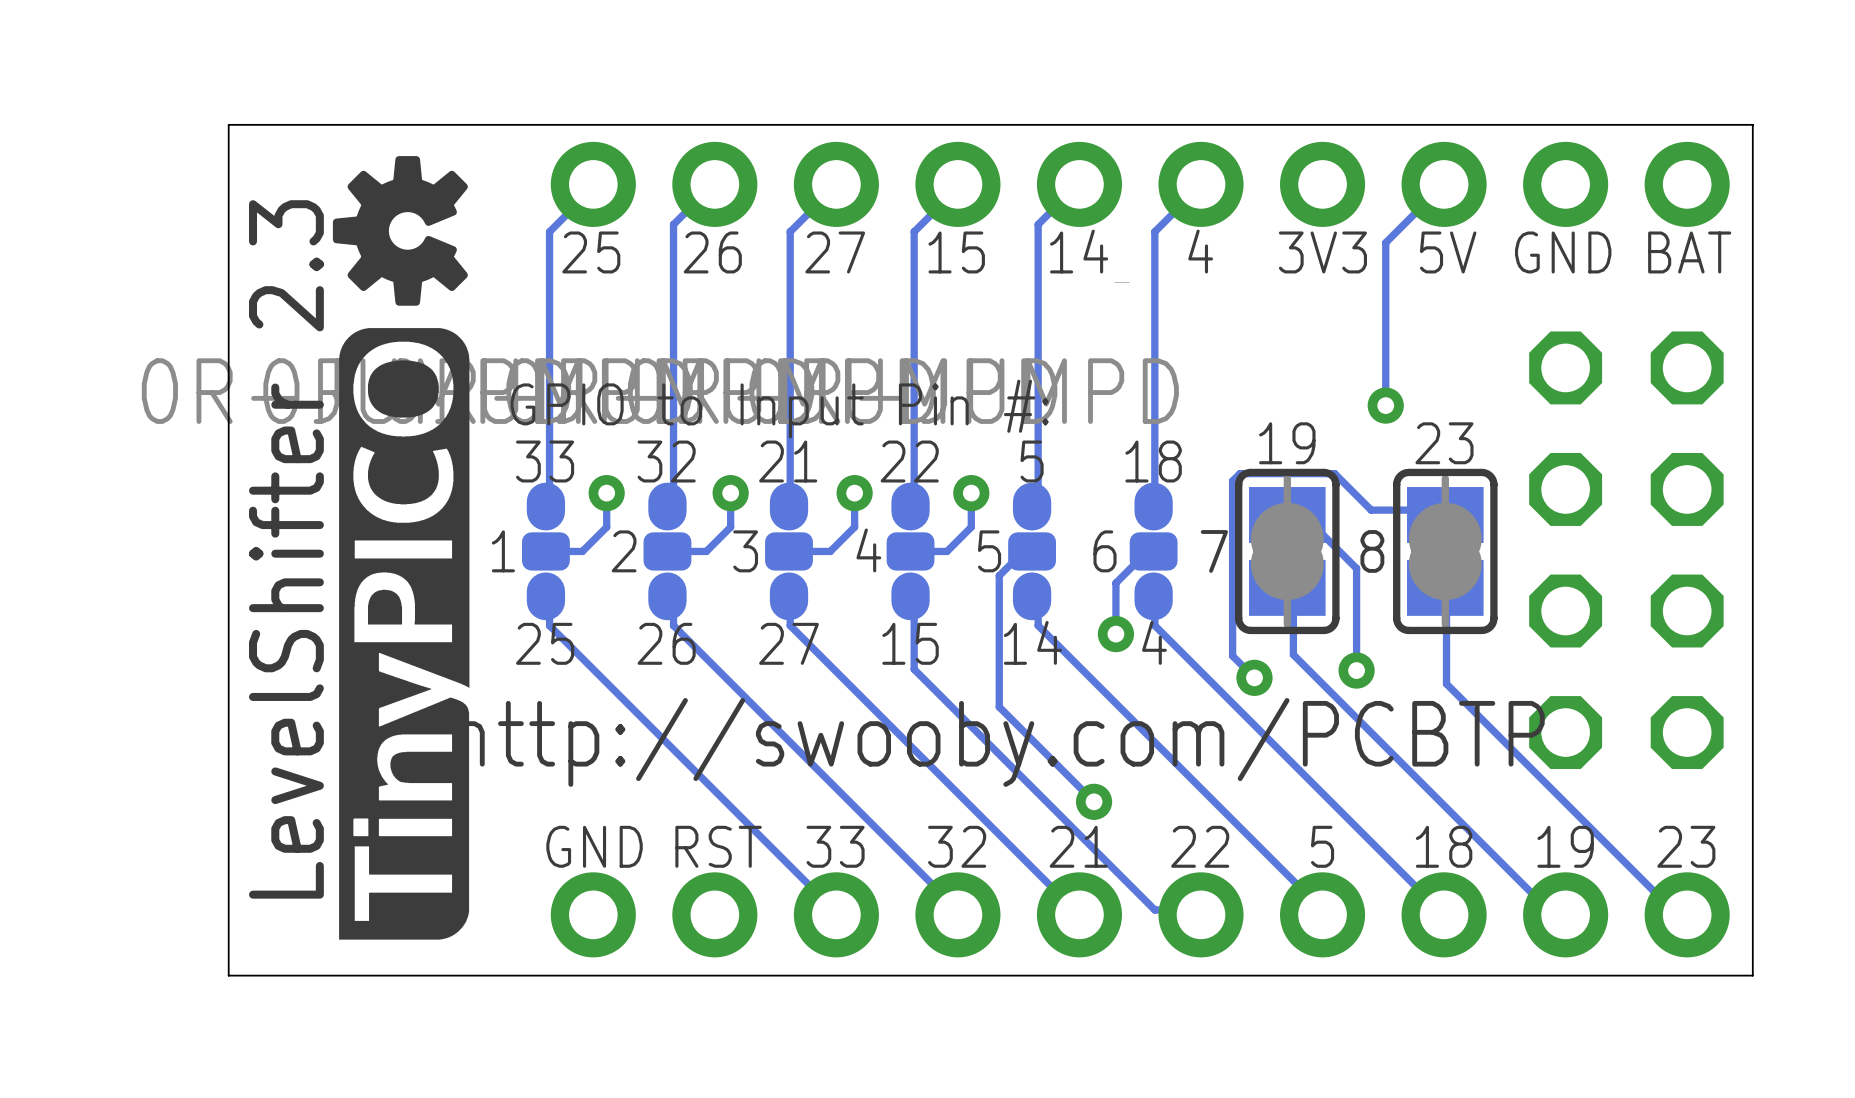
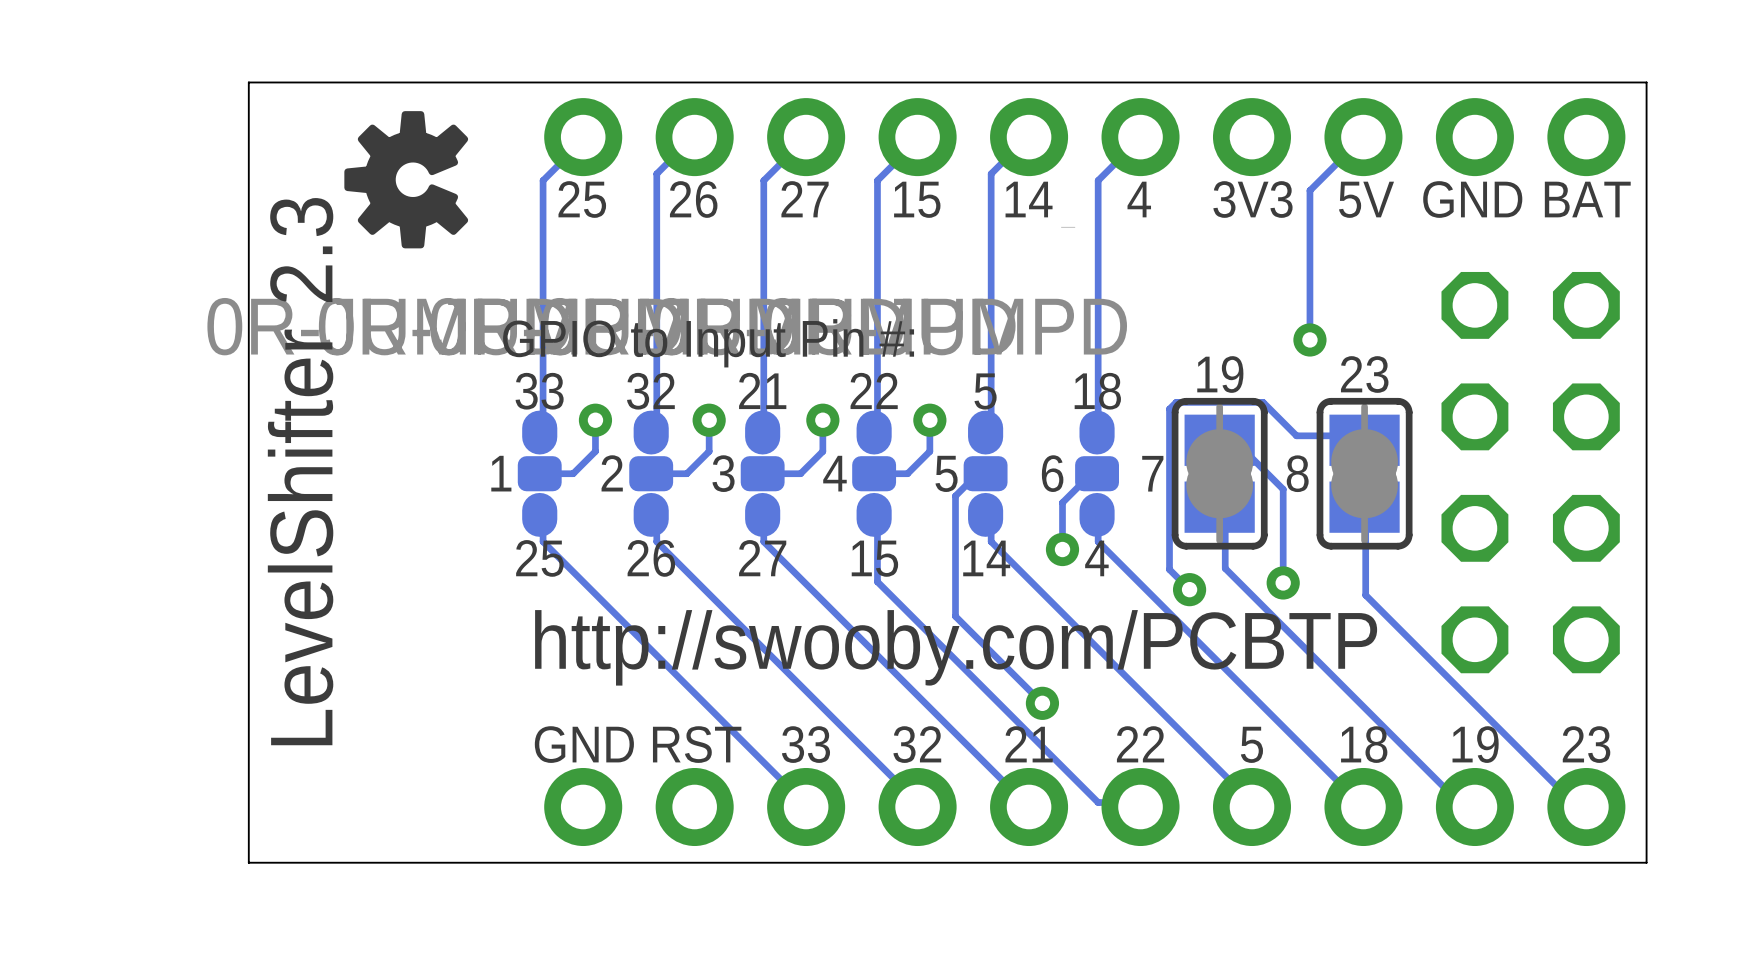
drawing: [339, 328, 470, 940] -> none

